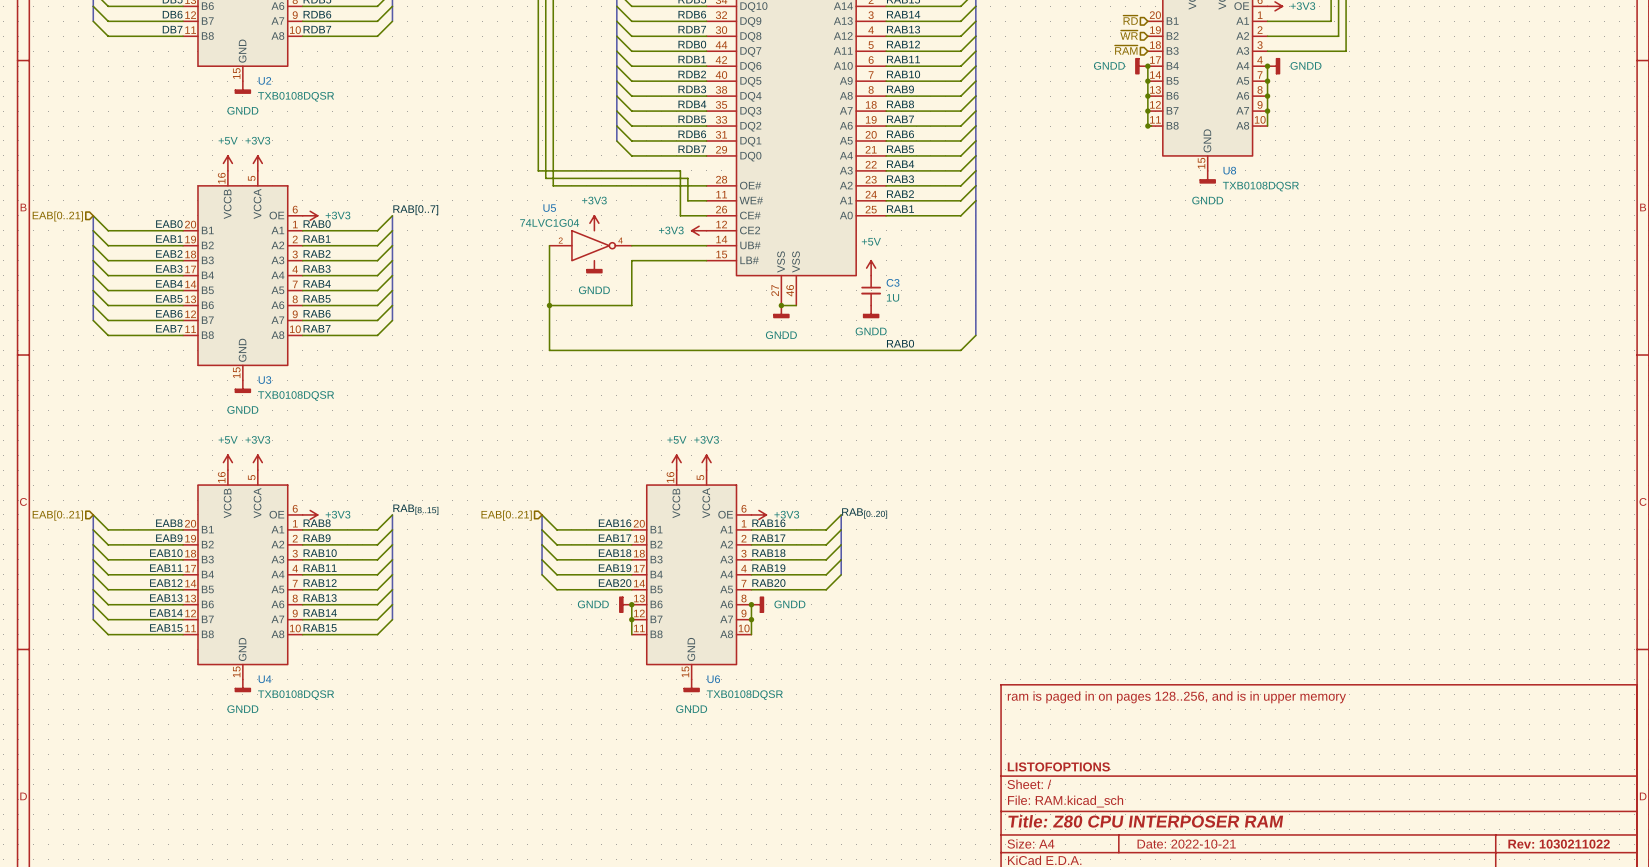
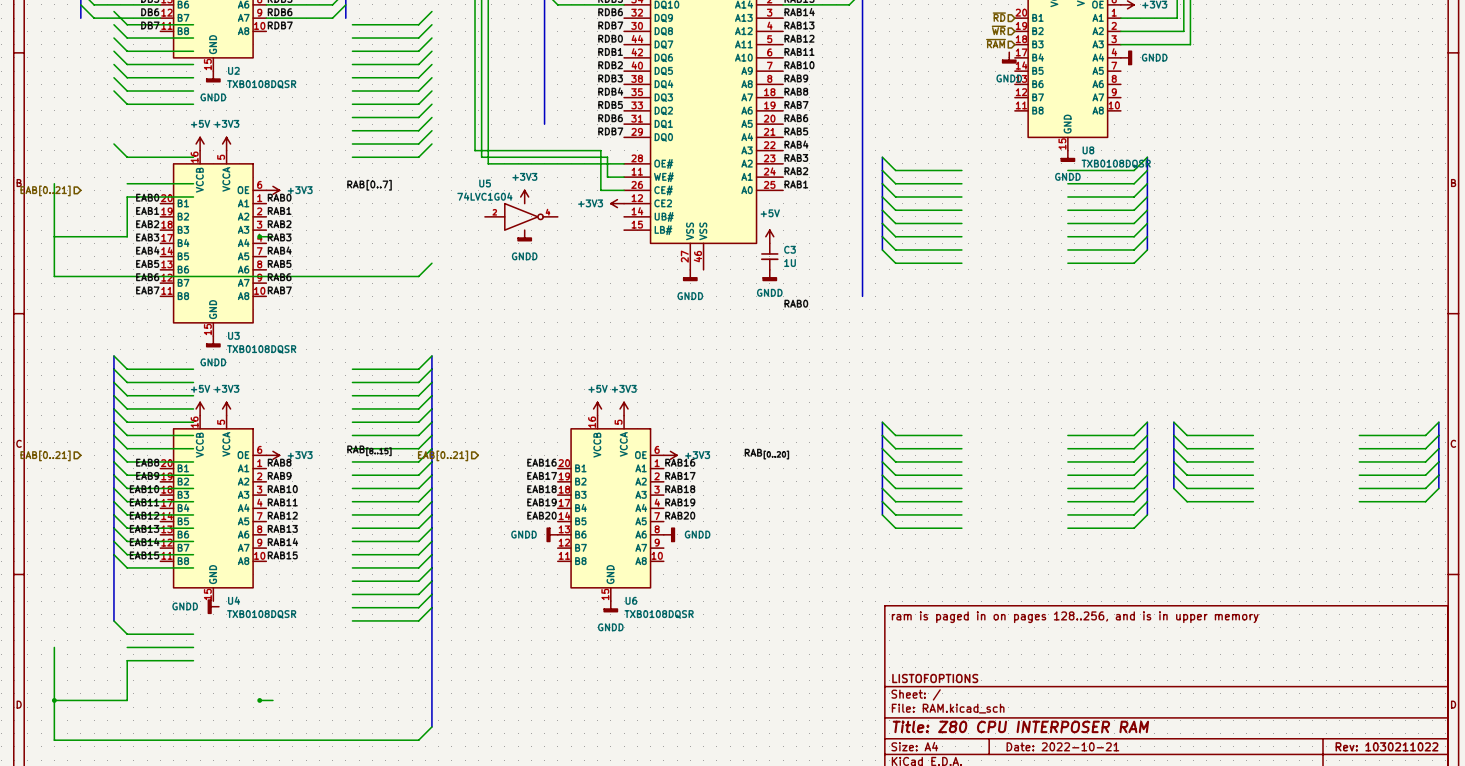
wire: (616, 6) (631, 21) (706, 21) -> none
wire: (975, 6) (960, 21) (886, 21) -> none
wire: (93, 21) (108, 36) (183, 36) -> (113, 11) (127, 24) (193, 24)
wire: (392, 21) (377, 36) (302, 36) -> (431, 11) (418, 24) (352, 24)
wire: (616, 21) (631, 36) (706, 36) -> none
wire: (975, 21) (960, 36) (886, 36) -> none
wire: none -> (113, 24) (127, 38) (193, 38)
wire: none -> (431, 24) (418, 38) (352, 38)
wire: (616, 36) (631, 51) (706, 51) -> none
wire: (975, 36) (960, 51) (886, 51) -> none
wire: none -> (113, 38) (127, 51) (193, 51)
wire: none -> (431, 38) (418, 51) (352, 51)
wire: (616, 51) (631, 66) (706, 66) -> none
wire: (975, 51) (960, 66) (886, 66) -> none
wire: none -> (113, 51) (127, 64) (193, 64)
wire: none -> (431, 51) (418, 64) (352, 64)
wire: (616, 66) (631, 81) (706, 81) -> none
wire: (975, 66) (960, 81) (886, 81) -> none
power symbol rotation: 0° (1141, 66) -> 90° counterclockwise (1009, 57)
wire: (1147, 66) (1147, 126) (1151, 126) -> none
junction: (1147, 66) -> none
wire: (1267, 66) (1267, 126) -> none
junction: (1267, 66) -> none
wire: none -> (113, 64) (127, 77) (193, 77)
wire: none -> (431, 64) (418, 77) (352, 77)
wire: (616, 81) (631, 96) (706, 96) -> none
wire: (975, 81) (960, 96) (886, 96) -> none
junction: (1147, 81) -> none
junction: (1267, 81) -> none
wire: none -> (113, 77) (127, 91) (193, 91)
wire: none -> (431, 77) (418, 91) (352, 91)
wire: (616, 96) (631, 111) (706, 111) -> none
wire: (975, 96) (960, 111) (886, 111) -> none
junction: (1147, 96) -> none
junction: (1267, 96) -> none
wire: none -> (431, 91) (418, 104) (352, 104)
wire: (616, 111) (631, 126) (706, 126) -> none
wire: (975, 111) (960, 126) (886, 126) -> none
junction: (1147, 111) -> none
junction: (1267, 111) -> none
wire: none -> (431, 104) (418, 117) (352, 117)
wire: (616, 126) (631, 140) (706, 140) -> none
wire: (975, 126) (960, 140) (886, 140) -> none
junction: (1147, 126) -> none
wire: none -> (431, 117) (418, 130) (352, 130)
wire: (616, 140) (631, 155) (706, 155) -> none
wire: (975, 140) (960, 155) (886, 155) -> none
wire: (975, 155) (960, 170) (886, 170) -> none
wire: (975, 170) (960, 185) (886, 185) -> none
wire: none -> (882, 157) (895, 170) (961, 170)
bus: none -> (882, 157) (882, 249)
wire: none -> (1147, 157) (1134, 170) (1067, 170)
bus: none -> (1147, 157) (1147, 249)
wire: (975, 185) (960, 200) (886, 200) -> none
wire: none -> (882, 170) (895, 183) (961, 183)
wire: none -> (1147, 170) (1134, 183) (1067, 183)
wire: (975, 200) (960, 215) (886, 215) -> none
wire: none -> (54, 183) (54, 276) (418, 276) (431, 263)
wire: none -> (127, 183) (193, 183)
wire: none -> (882, 183) (895, 196) (961, 196)
wire: none -> (1147, 183) (1134, 196) (1067, 196)
wire: (93, 215) (108, 230) (183, 230) -> (113, 144) (127, 157) (193, 157)
bus: (93, 215) (93, 320) -> none
wire: (392, 215) (377, 230) (302, 230) -> (431, 144) (418, 157) (352, 157)
bus: (392, 215) (392, 320) -> none
wire: none -> (193, 196) (127, 196) (127, 236) (54, 236)
wire: none -> (882, 196) (895, 210) (961, 210)
wire: none -> (1147, 196) (1134, 210) (1067, 210)
wire: (93, 230) (108, 245) (183, 245) -> (113, 91) (127, 104) (193, 104)
wire: (392, 230) (377, 245) (302, 245) -> (431, 130) (418, 144) (352, 144)
wire: none -> (882, 210) (895, 223) (961, 223)
wire: none -> (1147, 210) (1134, 223) (1067, 223)
wire: (93, 245) (108, 260) (183, 260) -> none
wire: (392, 245) (377, 260) (302, 260) -> none
wire: (549, 245) (549, 350) (960, 350) (975, 335) -> none
wire: (631, 245) (706, 245) -> none
wire: none -> (882, 223) (895, 236) (961, 236)
wire: none -> (1147, 223) (1134, 236) (1067, 236)
wire: (93, 260) (108, 275) (183, 275) -> (113, 355) (127, 369) (193, 369)
wire: (392, 260) (377, 275) (302, 275) -> none
wire: (706, 260) (631, 260) (631, 305) (549, 305) -> none
wire: none -> (259, 236) (272, 236)
junction: none -> (259, 236)
wire: none -> (882, 236) (895, 249) (961, 249)
wire: none -> (1147, 236) (1134, 249) (1067, 249)
wire: (93, 275) (108, 290) (183, 290) -> (113, 369) (127, 382) (193, 382)
wire: (392, 275) (377, 290) (302, 290) -> none
wire: none -> (882, 249) (895, 263) (961, 263)
wire: none -> (1147, 249) (1134, 263) (1067, 263)
wire: (93, 290) (108, 305) (183, 305) -> (113, 382) (127, 395) (193, 395)
wire: (392, 290) (377, 305) (302, 305) -> none
wire: (93, 305) (108, 320) (183, 320) -> (113, 395) (127, 408) (193, 408)
wire: (392, 305) (377, 320) (302, 320) -> (431, 355) (418, 369) (352, 369)
junction: (549, 305) -> none
wire: (781, 305) (796, 305) -> none
junction: (781, 305) -> none
wire: (93, 320) (108, 335) (183, 335) -> (113, 408) (127, 422) (193, 422)
wire: (392, 320) (377, 335) (302, 335) -> (431, 369) (418, 382) (352, 382)
bus: none -> (113, 355) (113, 620)
bus: none -> (431, 355) (431, 726)
wire: none -> (431, 382) (418, 395) (352, 395)
wire: none -> (431, 395) (418, 408) (352, 408)
wire: none -> (431, 408) (418, 422) (352, 422)
wire: none -> (113, 422) (127, 435) (193, 435)
wire: none -> (431, 422) (418, 435) (352, 435)
wire: none -> (882, 422) (895, 435) (961, 435)
bus: none -> (882, 422) (882, 514)
wire: none -> (1147, 422) (1134, 435) (1067, 435)
bus: none -> (1147, 422) (1147, 514)
wire: none -> (1173, 422) (1187, 435) (1253, 435)
bus: none -> (1173, 422) (1173, 488)
wire: none -> (1438, 422) (1425, 435) (1359, 435)
bus: none -> (1438, 422) (1438, 488)
wire: none -> (113, 435) (127, 448) (193, 448)
wire: none -> (431, 435) (418, 448) (352, 448)
wire: none -> (882, 435) (895, 448) (961, 448)
wire: none -> (1147, 435) (1134, 448) (1067, 448)
wire: none -> (1173, 435) (1187, 448) (1253, 448)
wire: none -> (1438, 435) (1425, 448) (1359, 448)
wire: none -> (882, 448) (895, 461) (961, 461)
wire: none -> (1147, 448) (1134, 461) (1067, 461)
wire: none -> (1173, 448) (1187, 461) (1253, 461)
wire: none -> (1438, 448) (1425, 461) (1359, 461)
wire: (93, 514) (108, 529) (183, 529) -> (113, 448) (127, 461) (193, 461)
bus: (93, 514) (93, 619) -> none
wire: (392, 514) (377, 529) (302, 529) -> (431, 448) (418, 461) (352, 461)
bus: (392, 514) (392, 619) -> none
wire: (542, 514) (556, 529) (631, 529) -> none
bus: (542, 514) (542, 574) -> none
wire: (841, 514) (826, 529) (751, 529) -> none
bus: (841, 514) (841, 574) -> none
wire: none -> (882, 461) (895, 475) (961, 475)
wire: none -> (1147, 461) (1134, 475) (1067, 475)
wire: none -> (1173, 461) (1187, 475) (1253, 475)
wire: none -> (1438, 461) (1425, 475) (1359, 475)
wire: (93, 529) (108, 544) (183, 544) -> (113, 461) (127, 475) (193, 475)
wire: (392, 529) (377, 544) (302, 544) -> (431, 461) (418, 475) (352, 475)
wire: (542, 529) (556, 544) (631, 544) -> none
wire: (841, 529) (826, 544) (751, 544) -> none
wire: none -> (882, 475) (895, 488) (961, 488)
wire: none -> (1147, 475) (1134, 488) (1067, 488)
wire: none -> (1173, 475) (1187, 488) (1253, 488)
wire: none -> (1438, 475) (1425, 488) (1359, 488)
wire: (93, 544) (108, 559) (183, 559) -> (113, 475) (127, 488) (193, 488)
wire: (392, 544) (377, 559) (302, 559) -> (431, 475) (418, 488) (352, 488)
wire: (542, 544) (556, 559) (631, 559) -> none
wire: (841, 544) (826, 559) (751, 559) -> none
wire: none -> (882, 488) (895, 501) (961, 501)
wire: none -> (1147, 488) (1134, 501) (1067, 501)
wire: none -> (1173, 488) (1187, 501) (1253, 501)
wire: none -> (1438, 488) (1425, 501) (1359, 501)
wire: (93, 559) (108, 574) (183, 574) -> (113, 488) (127, 501) (193, 501)
wire: (392, 559) (377, 574) (302, 574) -> (431, 488) (418, 501) (352, 501)
wire: (542, 559) (556, 574) (631, 574) -> none
wire: (841, 559) (826, 574) (751, 574) -> none
wire: none -> (882, 501) (895, 514) (961, 514)
wire: none -> (1147, 501) (1134, 514) (1067, 514)
wire: (93, 574) (108, 589) (183, 589) -> (113, 501) (127, 514) (193, 514)
wire: (392, 574) (377, 589) (302, 589) -> (431, 501) (418, 514) (352, 514)
wire: (542, 574) (556, 589) (631, 589) -> none
wire: (841, 574) (826, 589) (751, 589) -> none
wire: none -> (882, 514) (895, 528) (961, 528)
wire: none -> (1147, 514) (1134, 528) (1067, 528)
wire: (93, 589) (108, 604) (183, 604) -> (113, 514) (127, 528) (193, 528)
wire: (392, 589) (377, 604) (302, 604) -> (431, 514) (418, 528) (352, 528)
wire: (93, 604) (108, 619) (183, 619) -> (113, 528) (127, 541) (193, 541)
wire: (392, 604) (377, 619) (302, 619) -> (431, 528) (418, 541) (352, 541)
wire: (631, 604) (631, 634) -> none
junction: (631, 604) -> none
wire: (751, 604) (751, 634) -> none
junction: (751, 604) -> none
wire: (93, 619) (108, 634) (183, 634) -> (113, 541) (127, 554) (193, 554)
wire: (392, 619) (377, 634) (302, 634) -> (431, 541) (418, 554) (352, 554)
junction: (631, 619) -> none
junction: (751, 619) -> none
wire: none -> (113, 554) (127, 567) (193, 567)
wire: none -> (431, 554) (418, 567) (352, 567)
wire: none -> (431, 567) (418, 581) (352, 581)
wire: none -> (431, 581) (418, 594) (352, 594)
wire: none -> (431, 594) (418, 607) (352, 607)
power symbol rotation: 0° (242, 685) -> 90° clockwise (213, 606)
wire: none -> (431, 607) (418, 620) (352, 620)
wire: none -> (113, 620) (127, 634) (193, 634)
wire: none -> (54, 647) (54, 740) (418, 740) (431, 726)
wire: none -> (127, 647) (193, 647)
wire: none -> (193, 660) (127, 660) (127, 700) (54, 700)
junction: none -> (54, 700)
wire: none -> (259, 700) (272, 700)
junction: none -> (259, 700)

